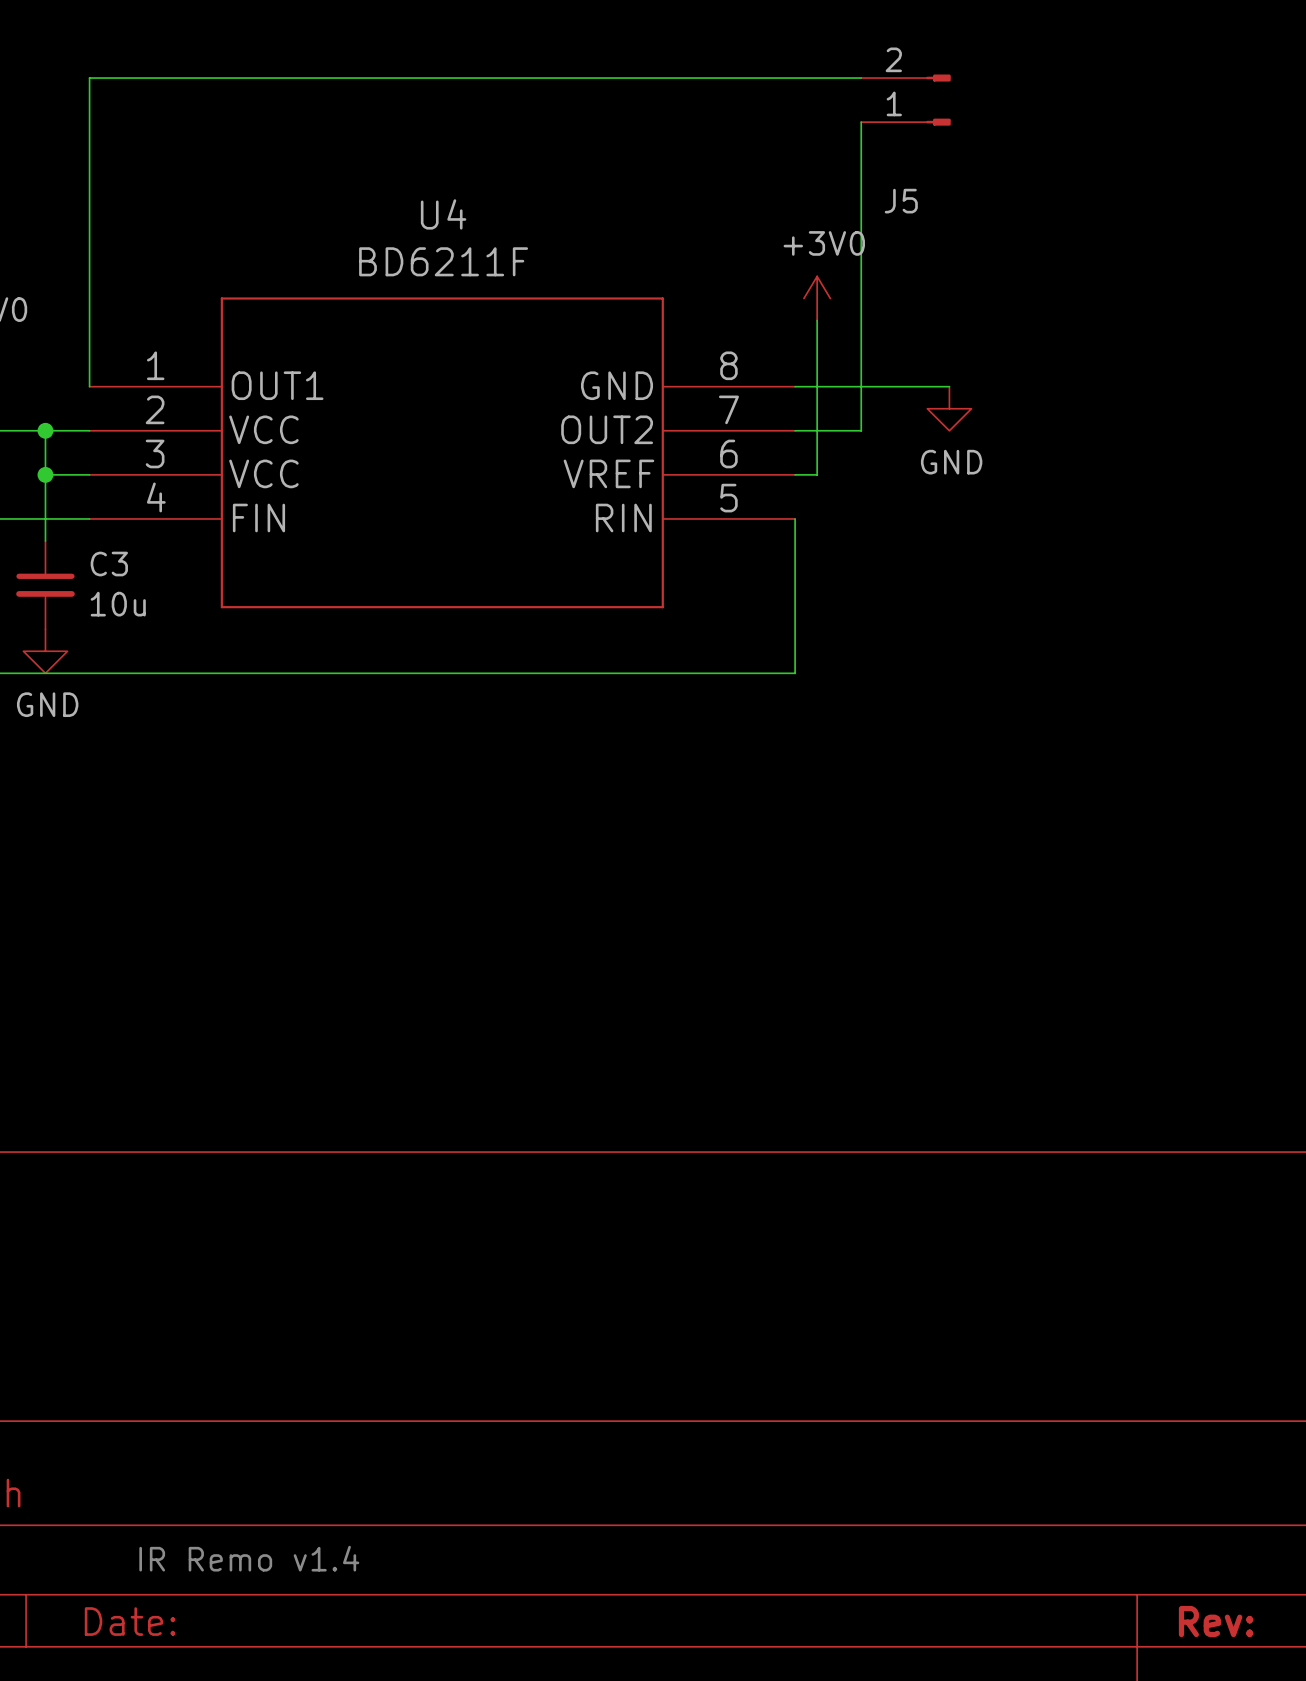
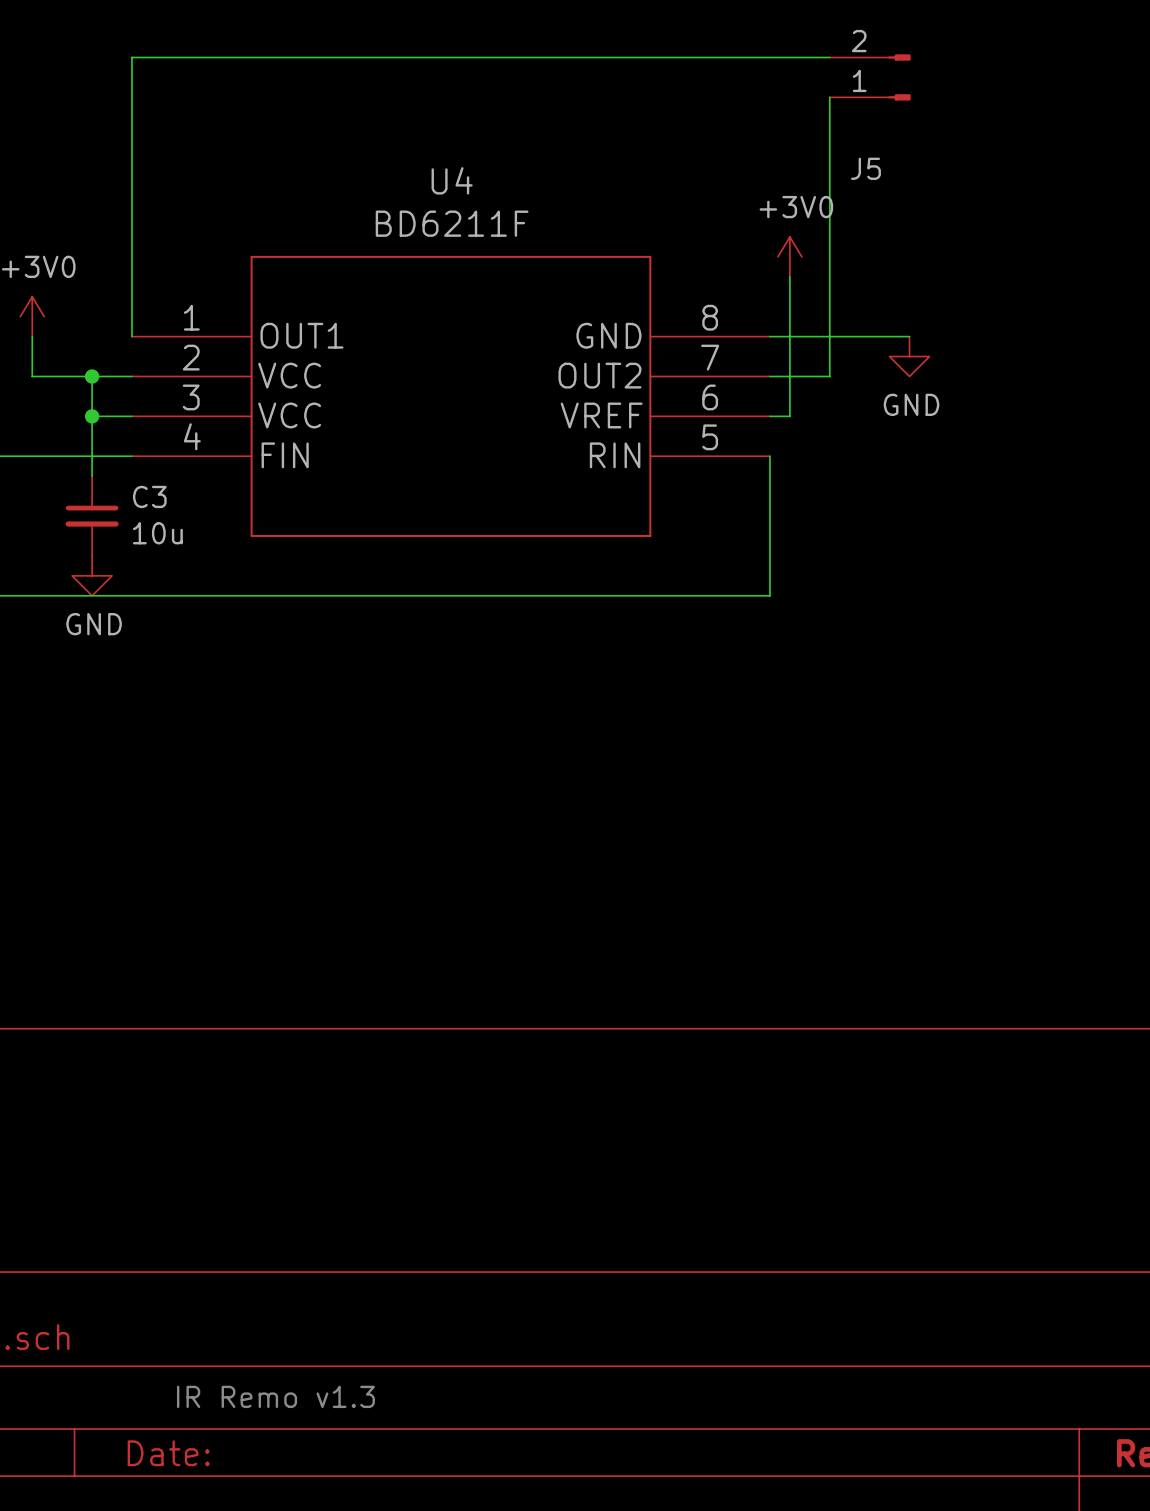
text: IR Remo v1.4 (249, 1558) -> IR Remo v1.3 (275, 1396)

